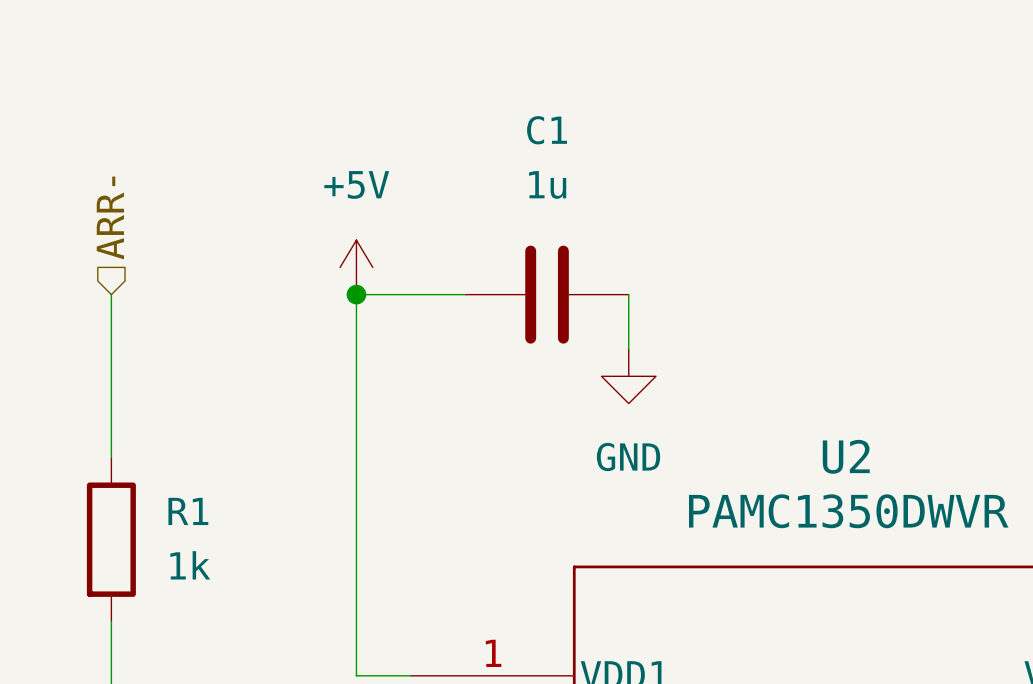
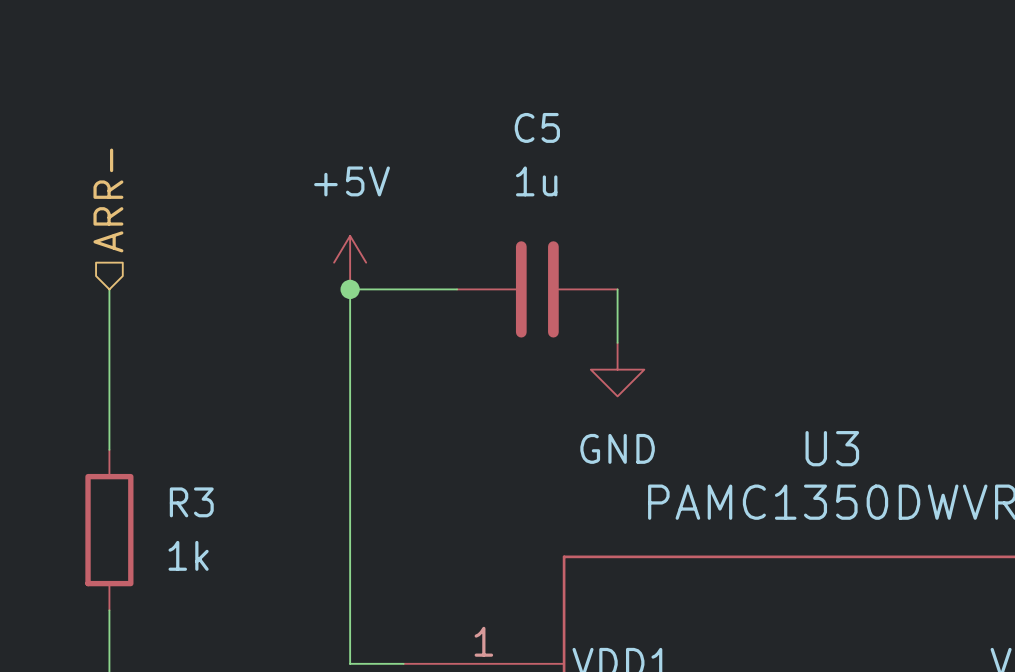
C1 name: C1 (547, 130) -> C5 (537, 127)
U2 name: U2 (846, 456) -> U3 (832, 448)
R1 name: R1 (188, 511) -> R3 (191, 502)

